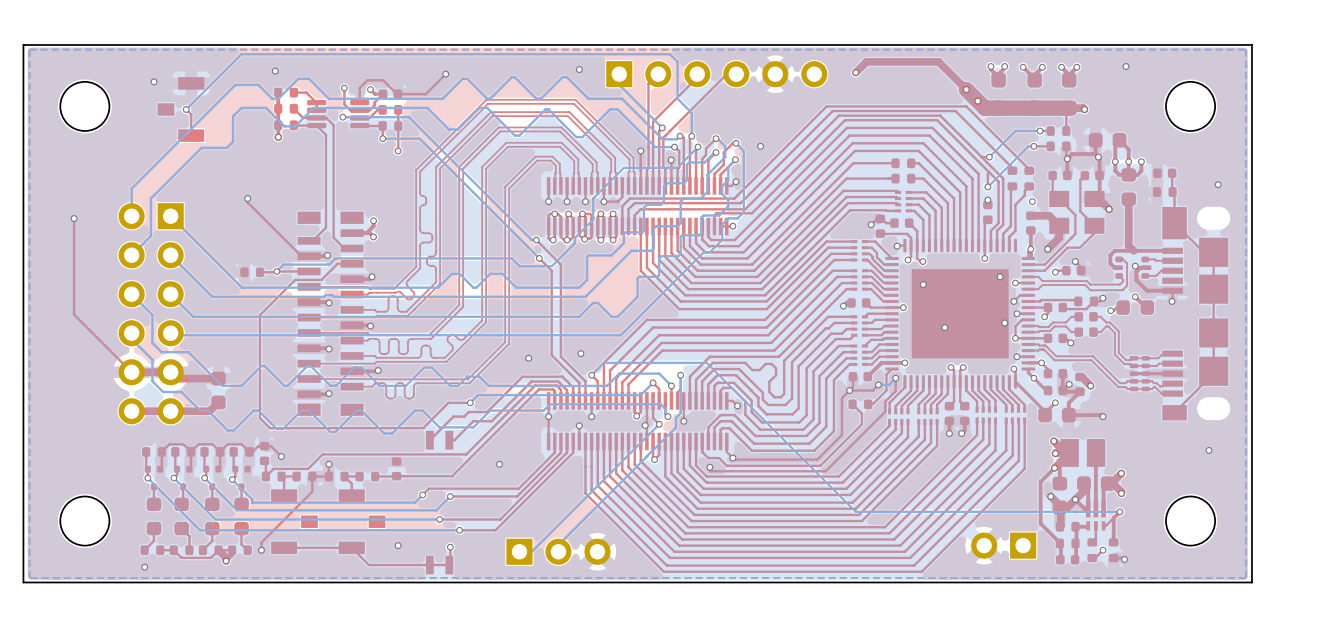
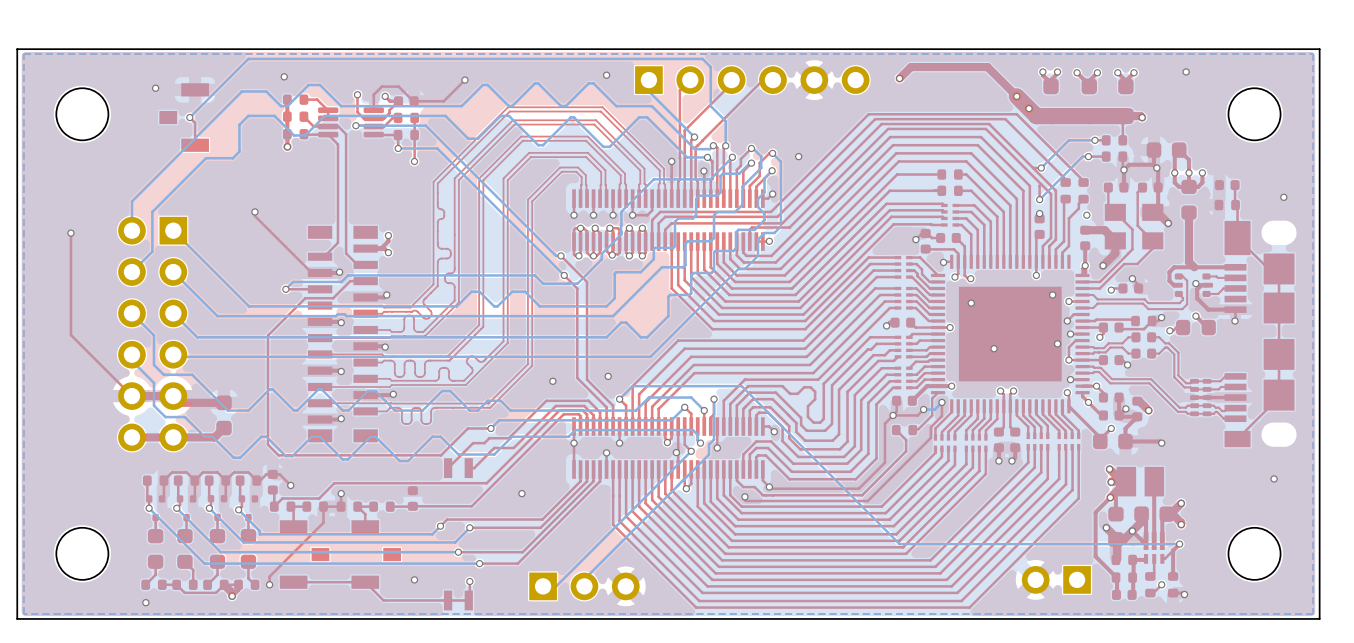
top track: (276, 271) (260, 272) -> none
part: (252, 272) -> none

